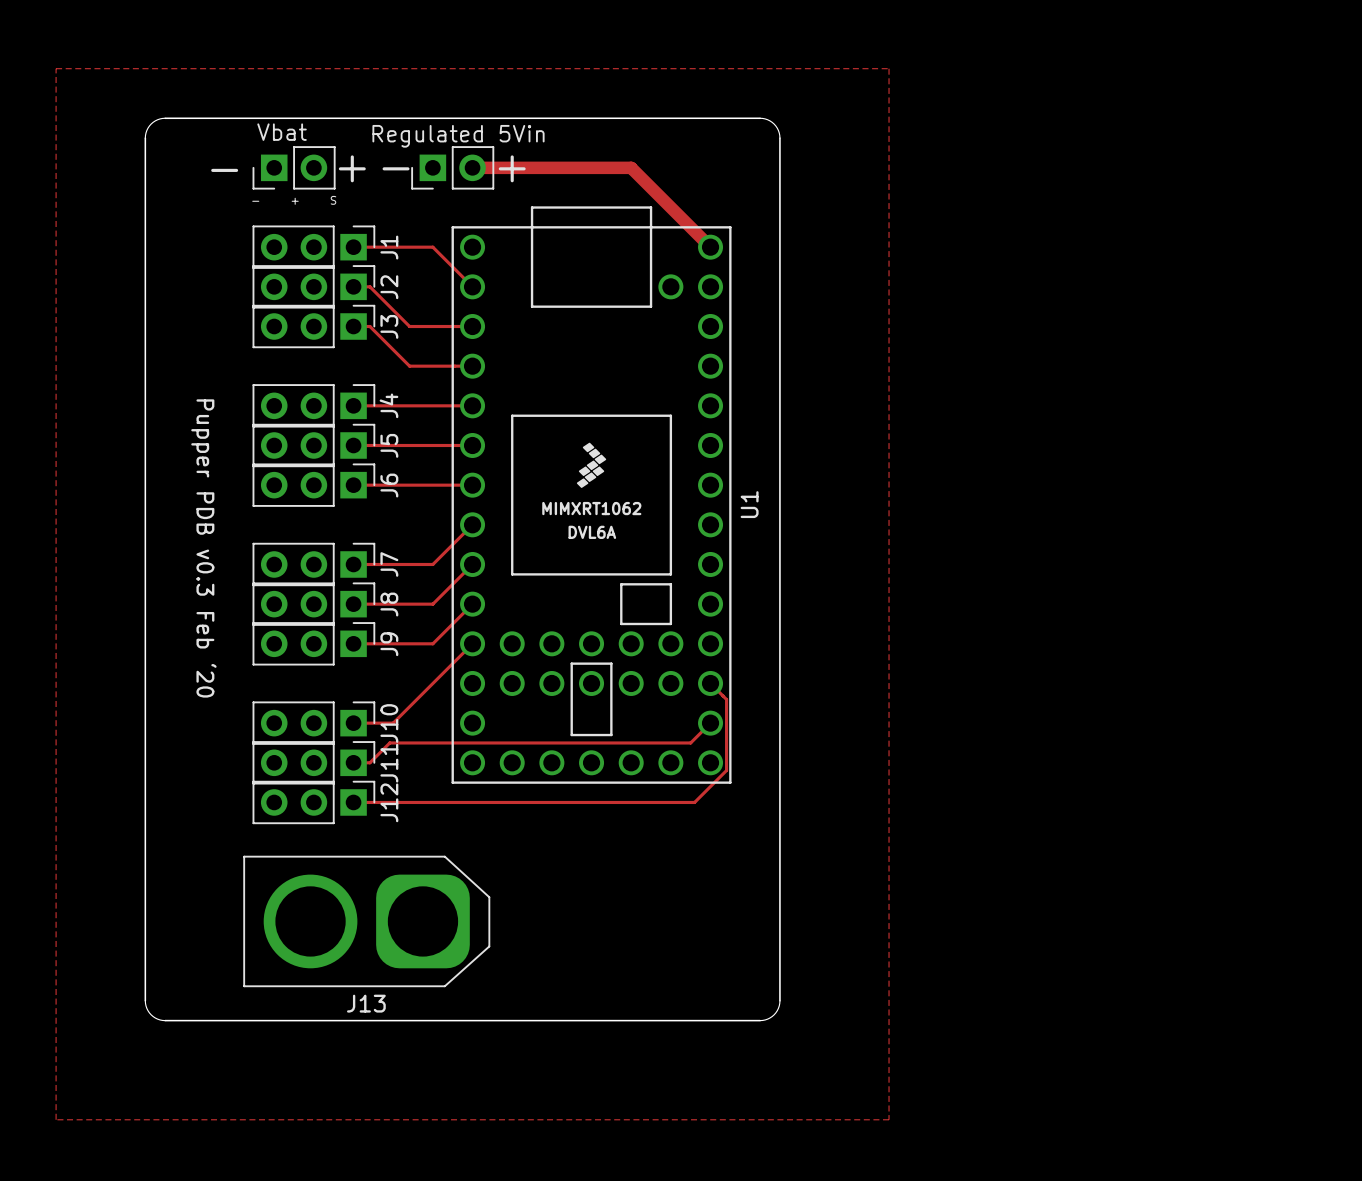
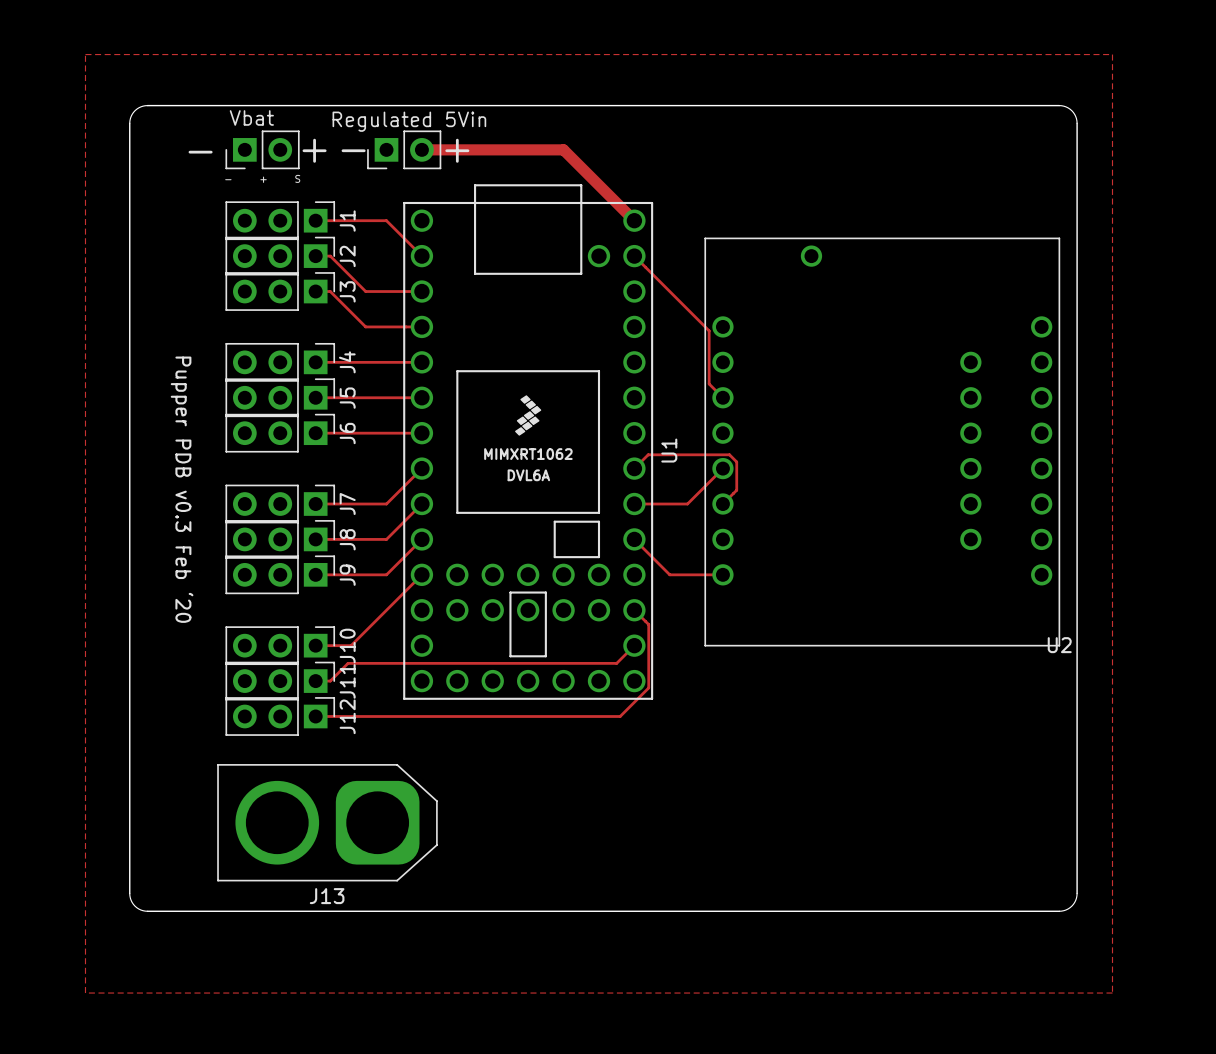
zone outline: (56, 68) (889, 68) (889, 1119) (56, 1119) (56, 68) -> (85, 54) (85, 993) (1112, 993) (1112, 54) (85, 54)
board edge: (760, 118) (767, 119) (774, 124) (778, 130) (779, 138) (779, 1000) (778, 1008) (774, 1014) (767, 1019) (760, 1020) -> (1059, 105) (1071, 110) (1077, 123) (1075, 900) (1068, 908) (1059, 911) (678, 911)
board edge: none -> (678, 105) (1059, 105)
track: none -> (634, 256) (709, 330) (709, 383) (722, 397)
U2: none -> (882, 442)
track: none -> (634, 468) (648, 454) (729, 454) (736, 461) (736, 490) (722, 504)
track: none -> (722, 468) (687, 504) (634, 504)
track: none -> (634, 539) (669, 574) (722, 574)

